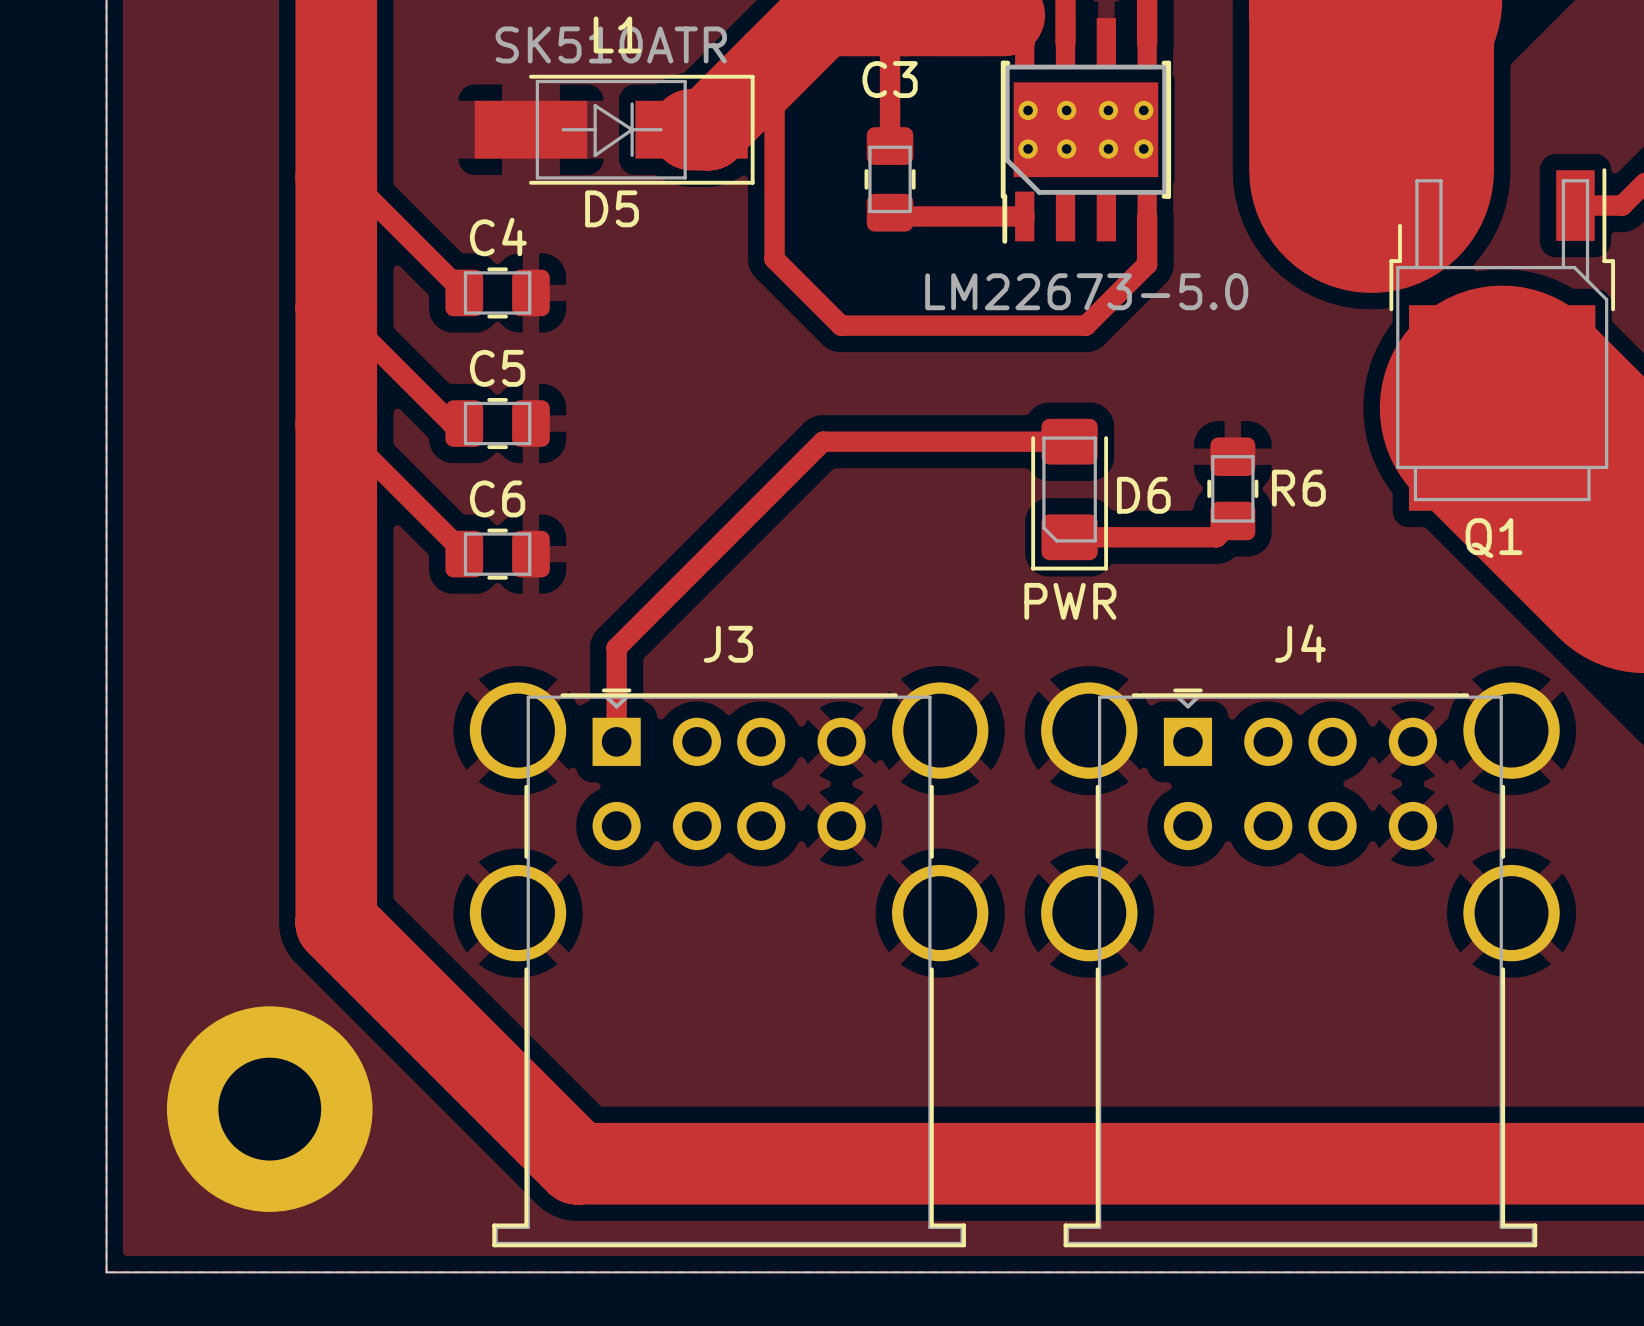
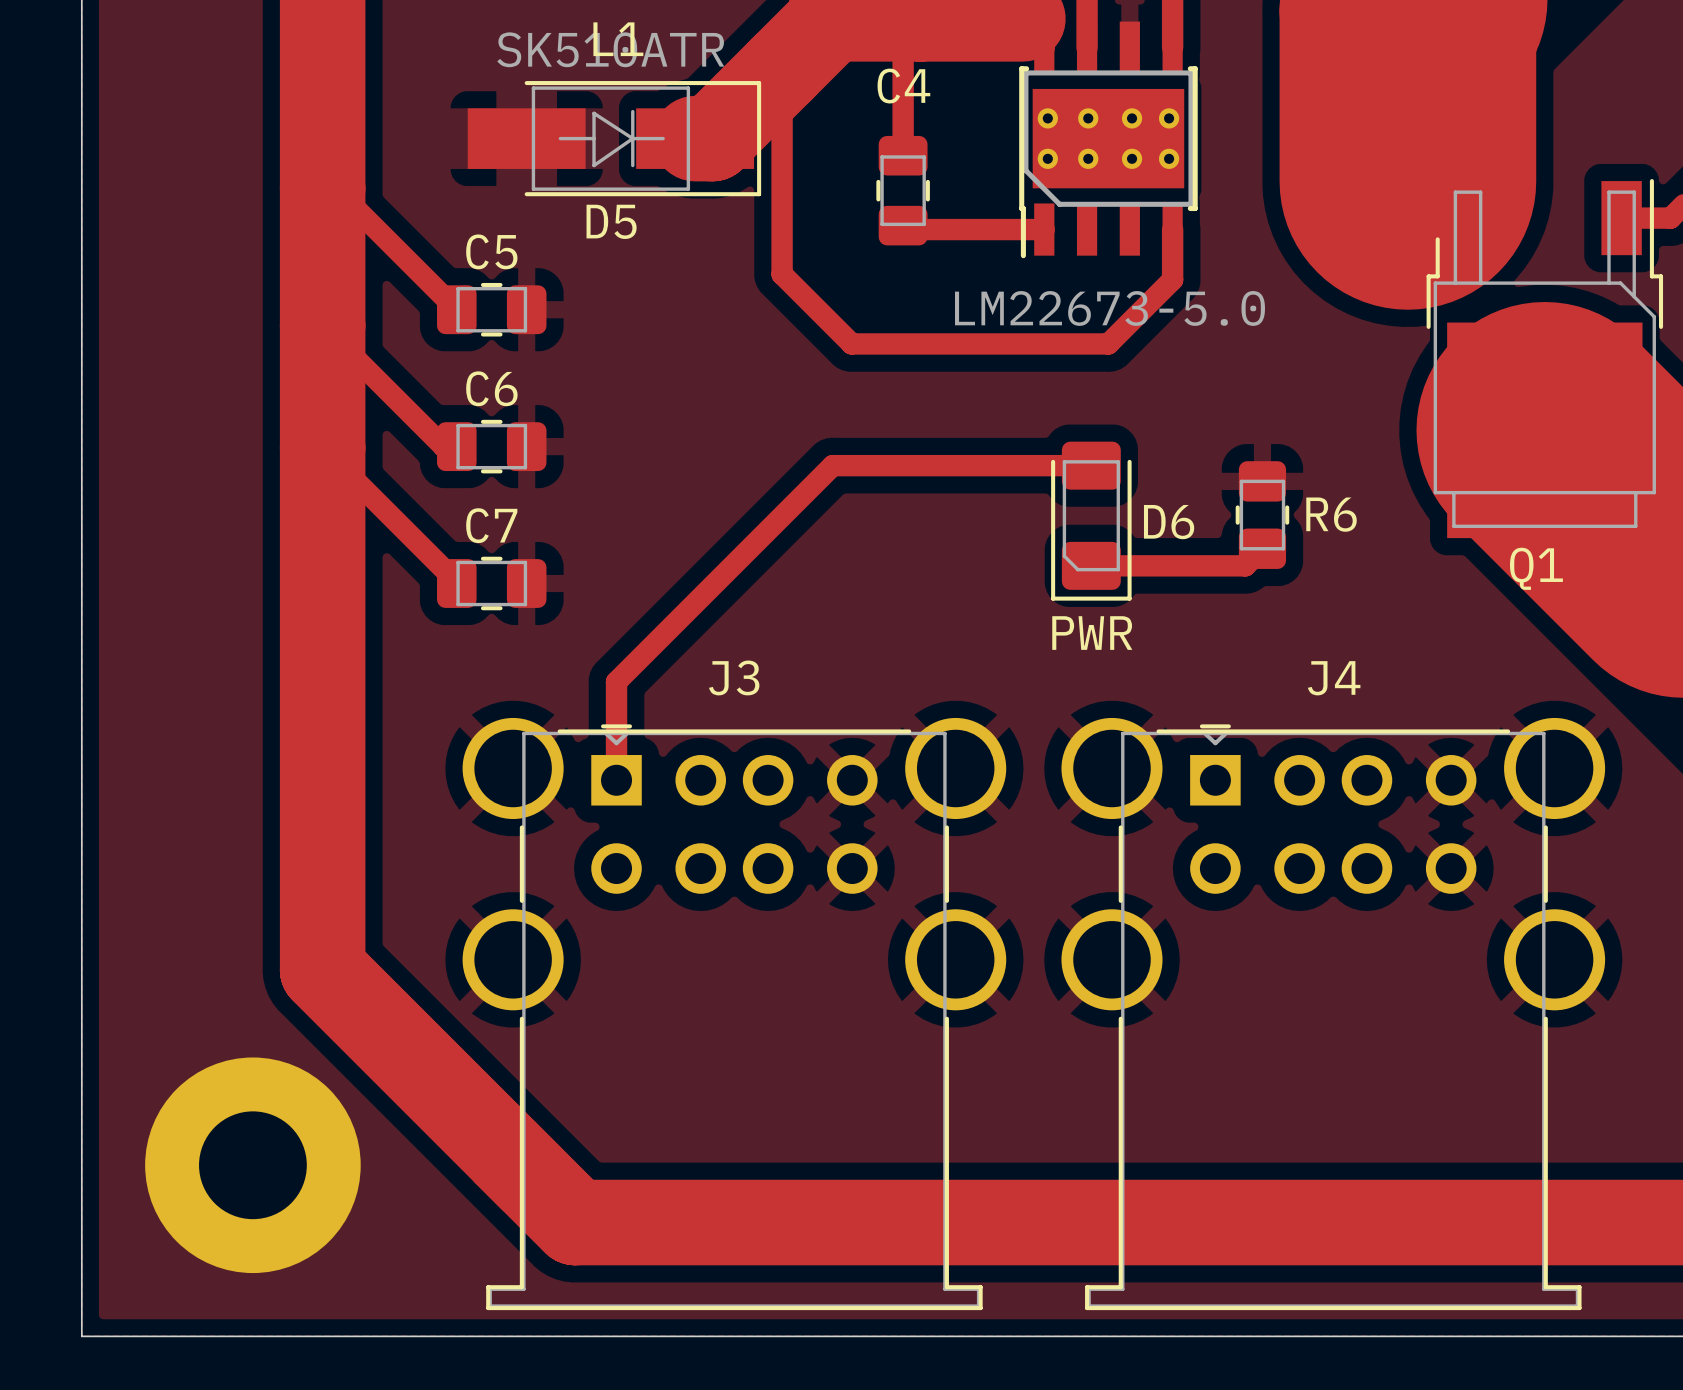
C3 name: C3 (890, 79) -> C4 (903, 86)
C4 name: C4 (498, 237) -> C5 (491, 251)
C5 name: C5 (497, 368) -> C6 (491, 388)
C6 name: C6 (497, 498) -> C7 (491, 525)

